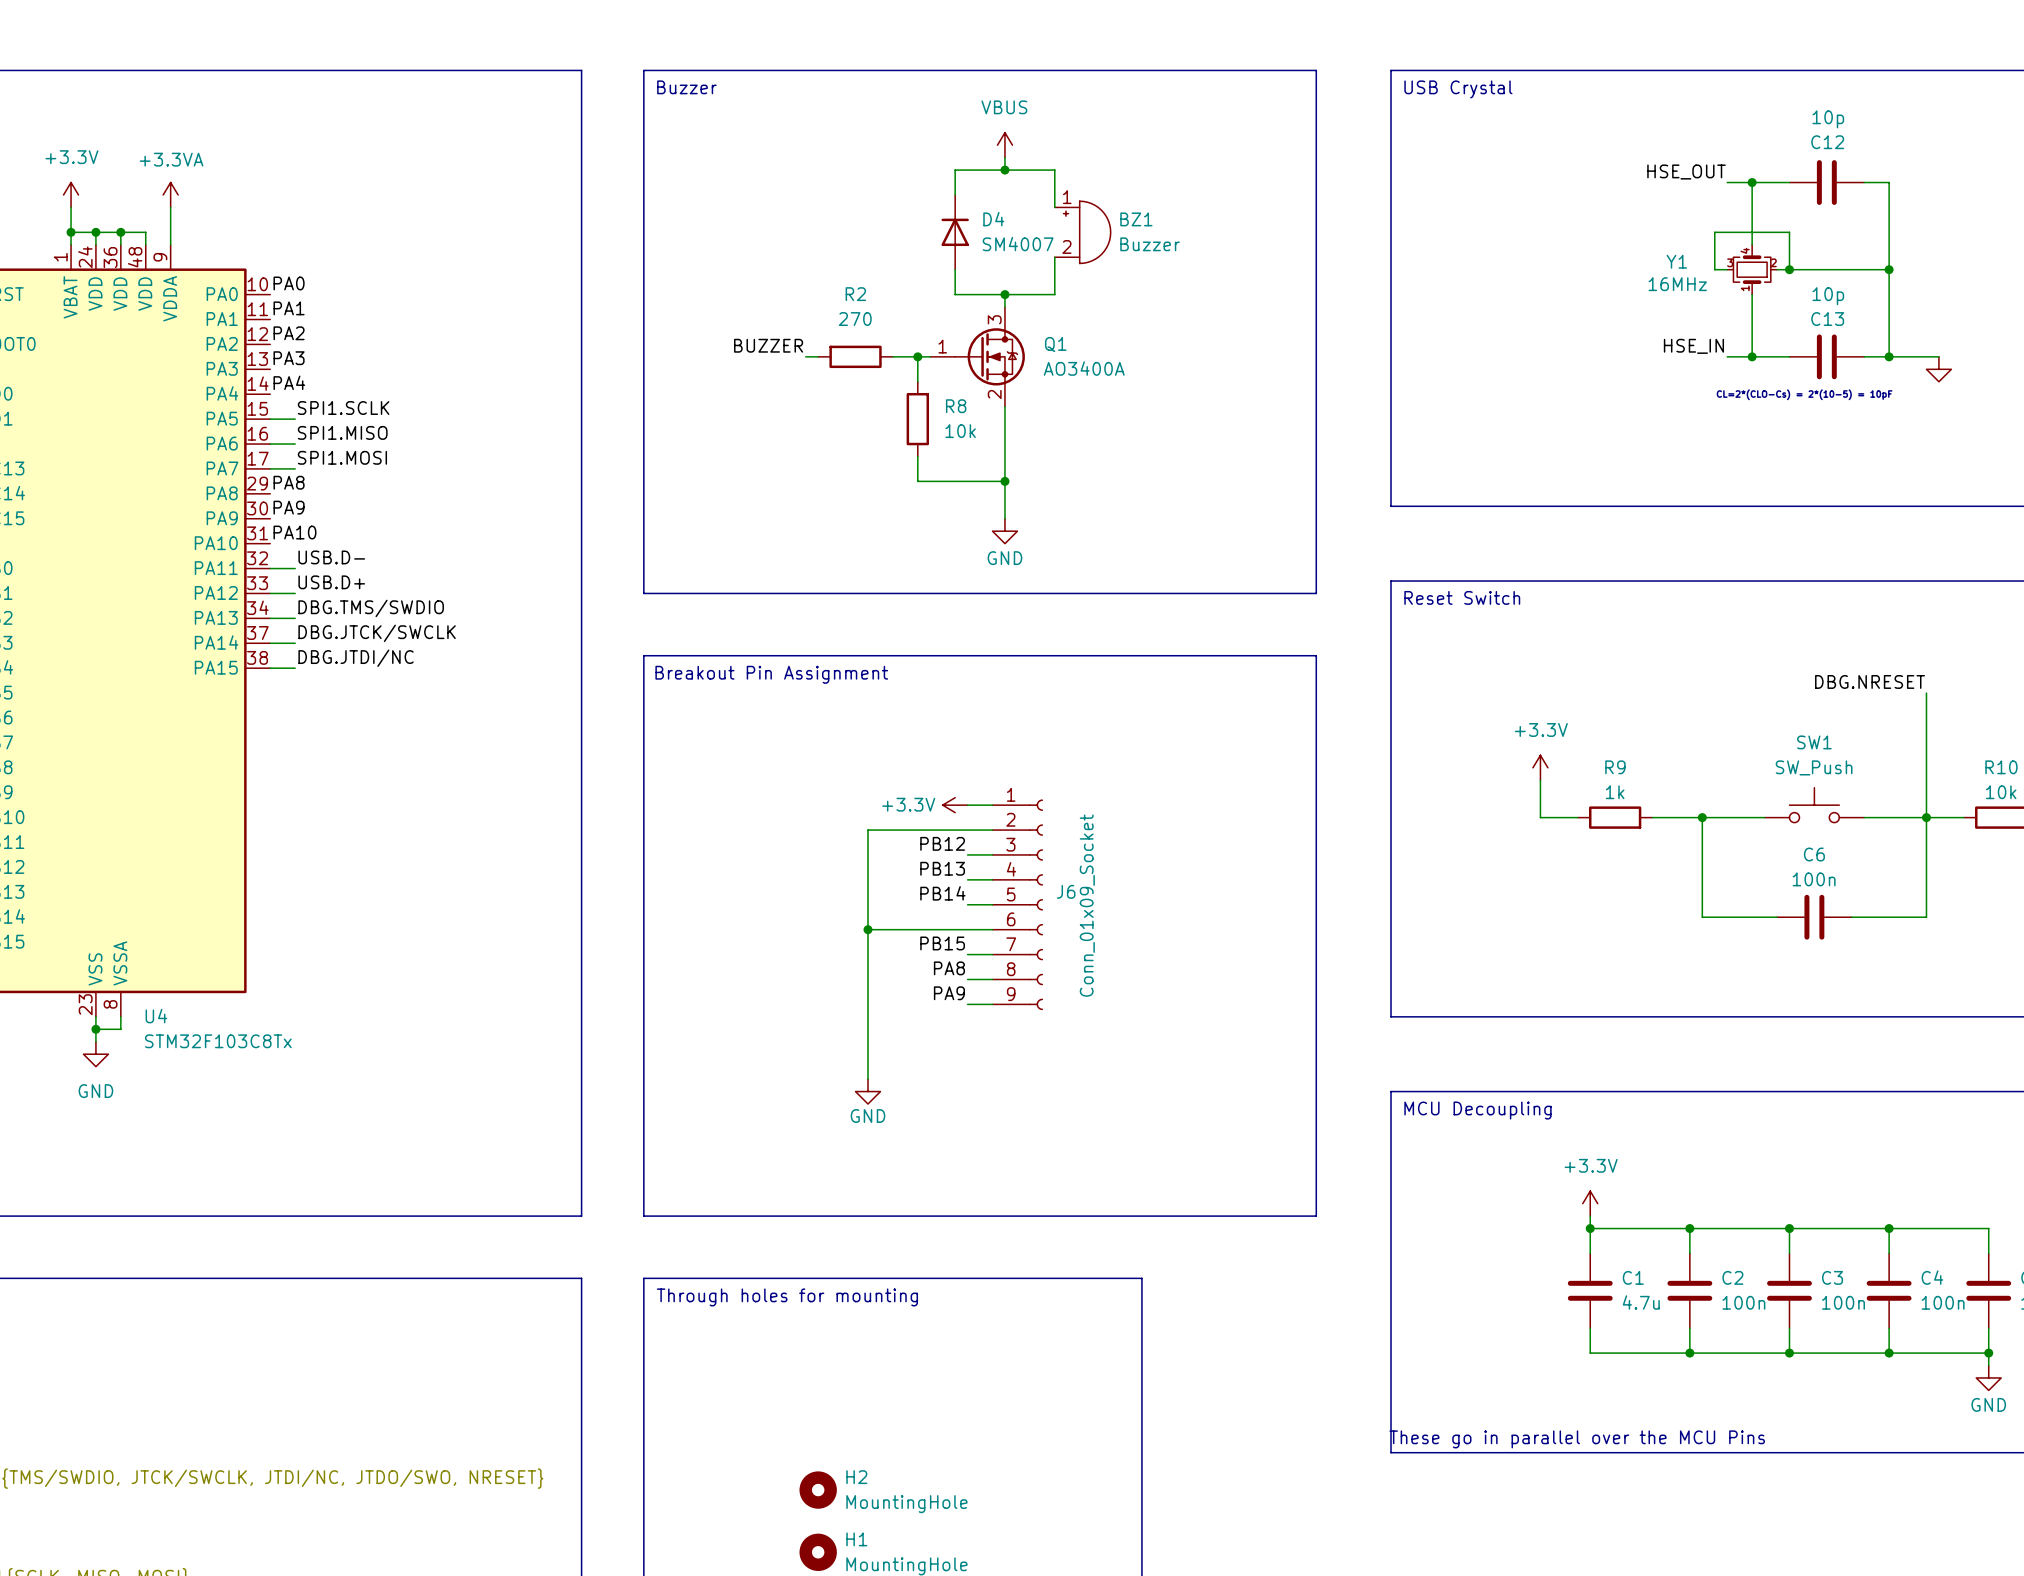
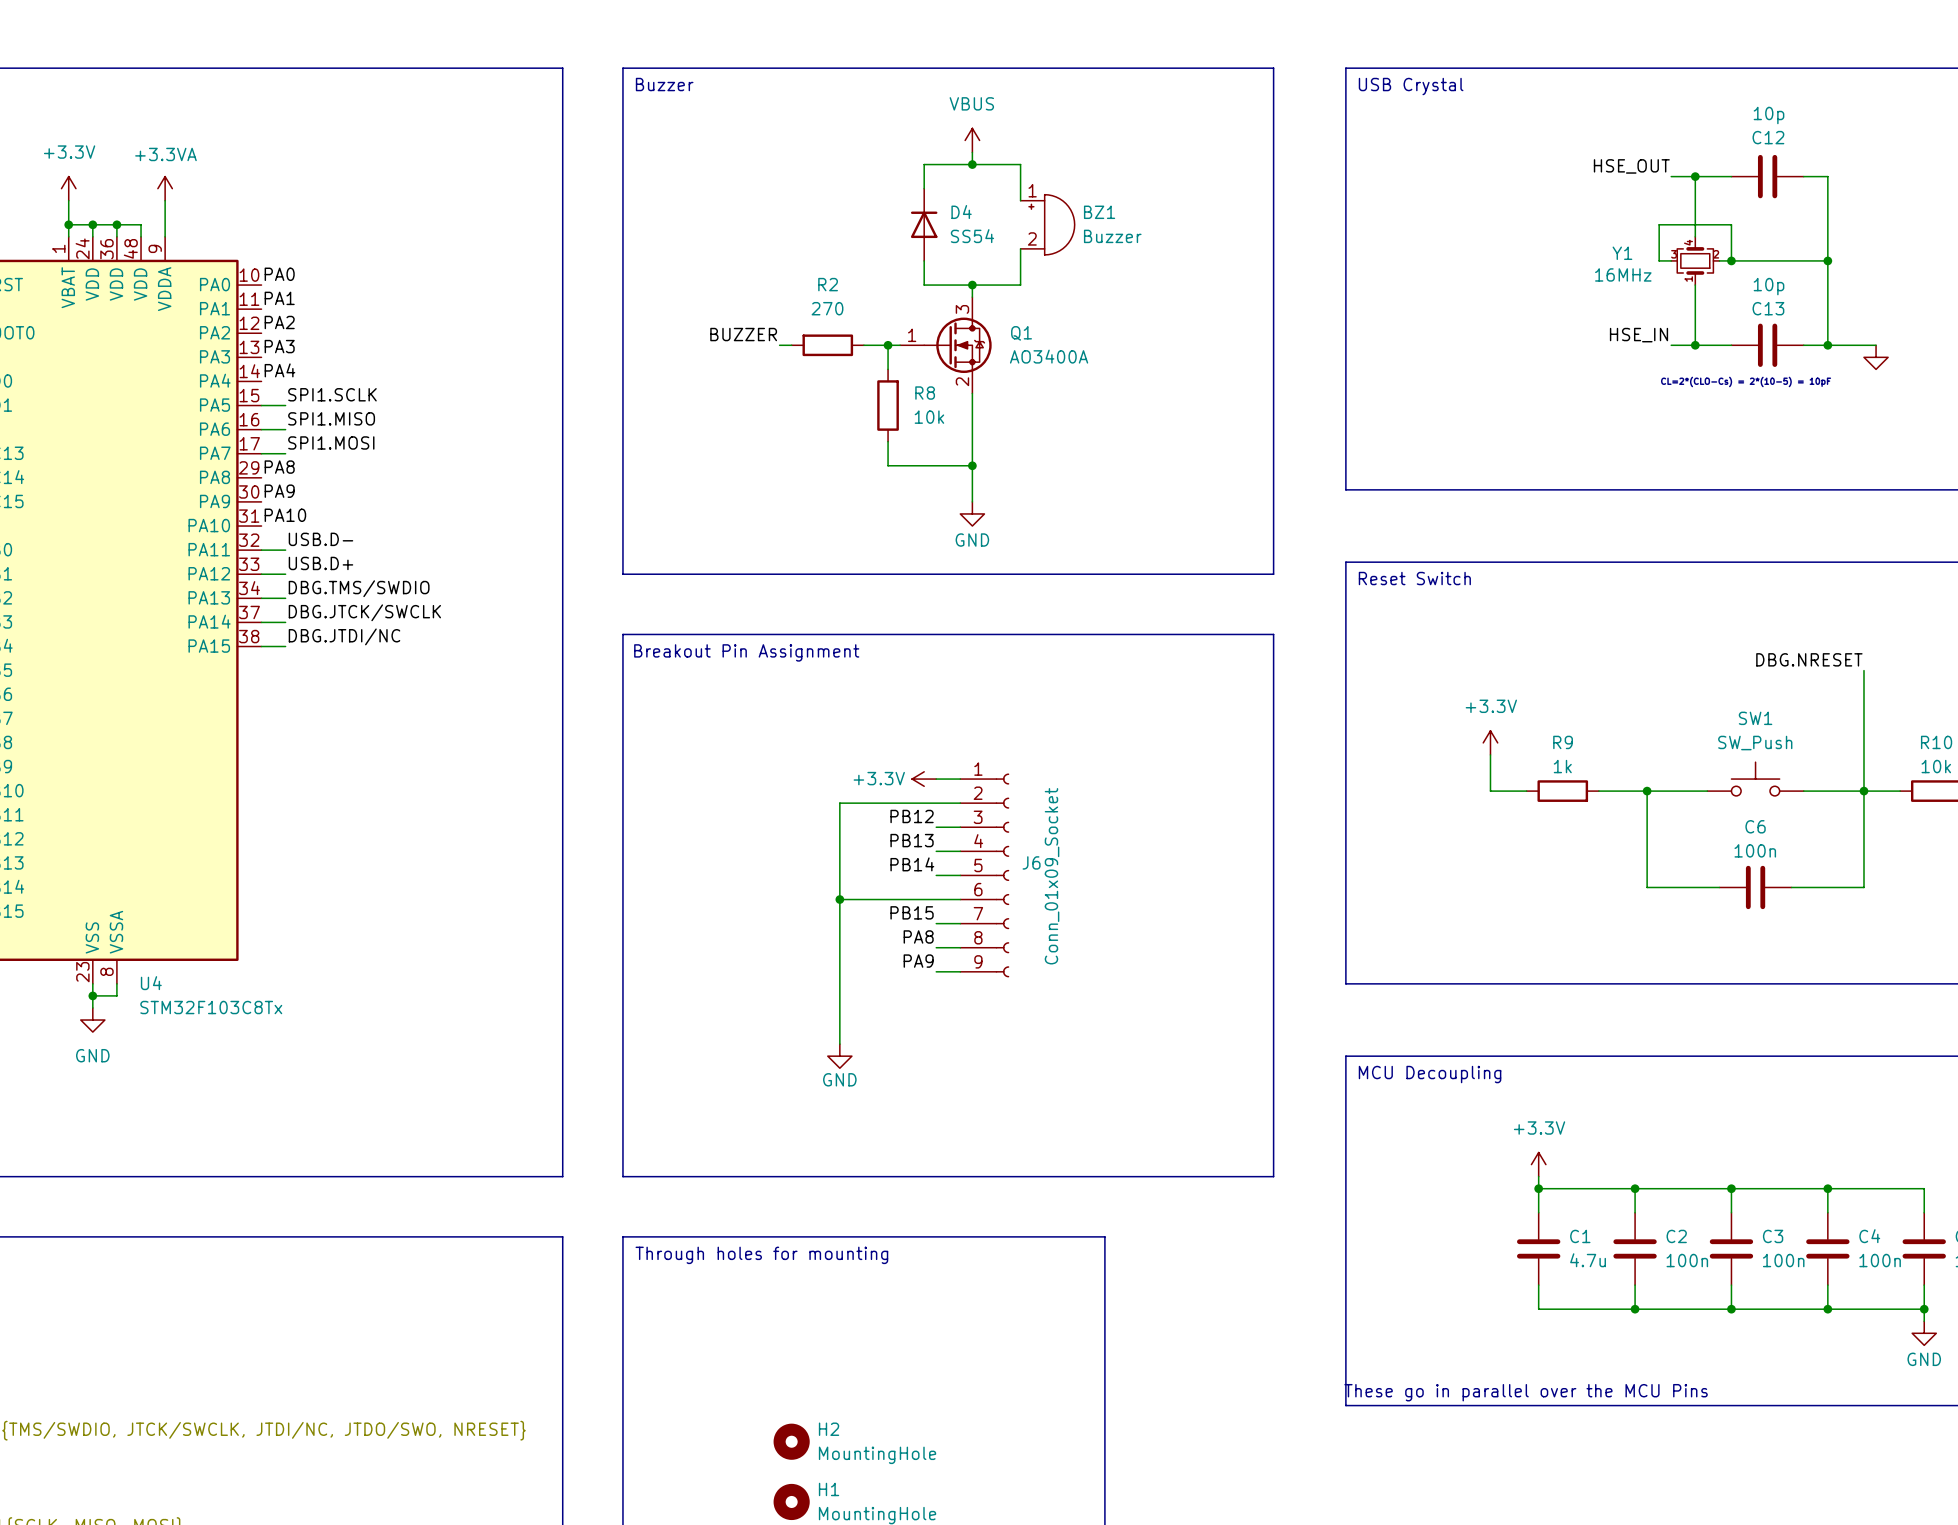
D4 value: SM4007 (1018, 244) -> SS54 (972, 236)

